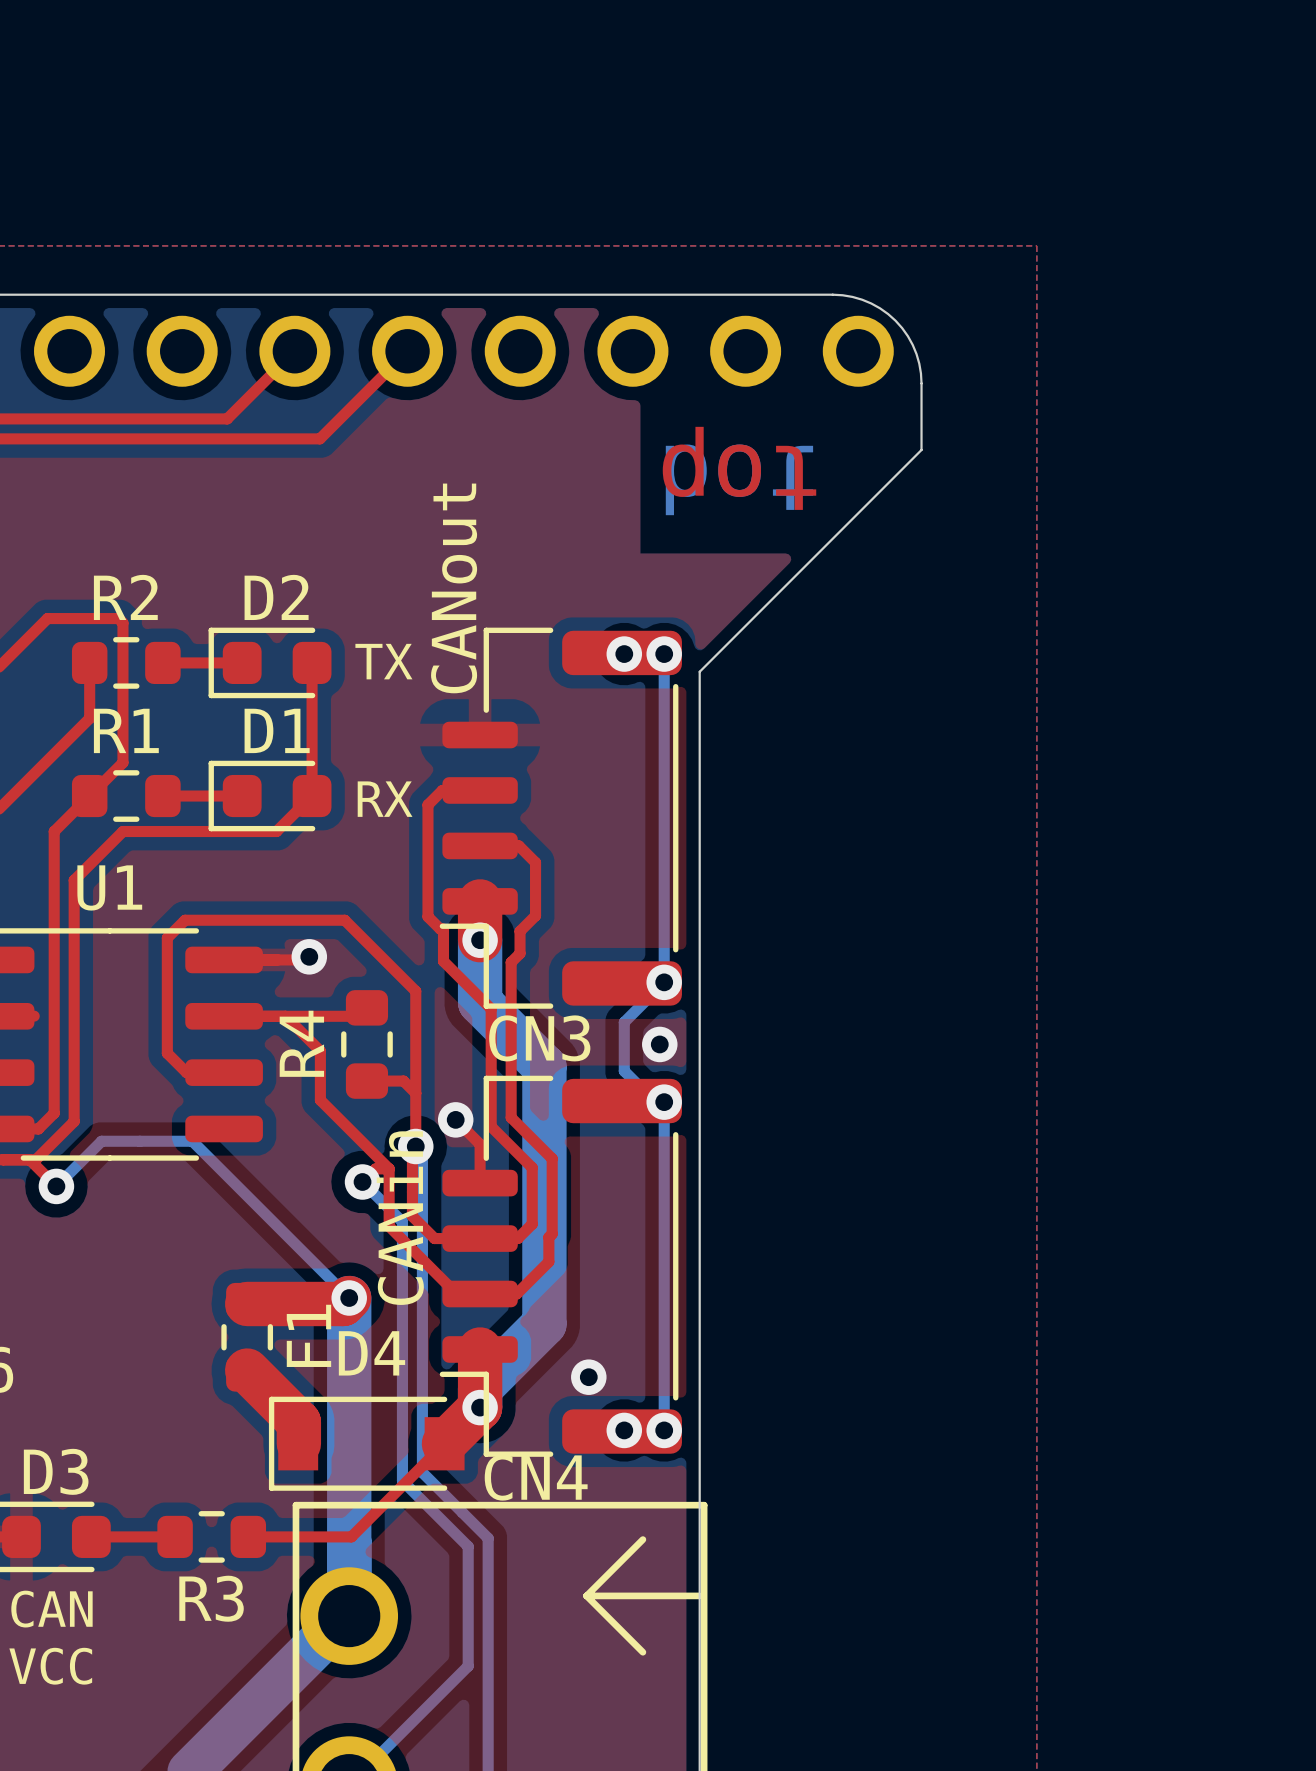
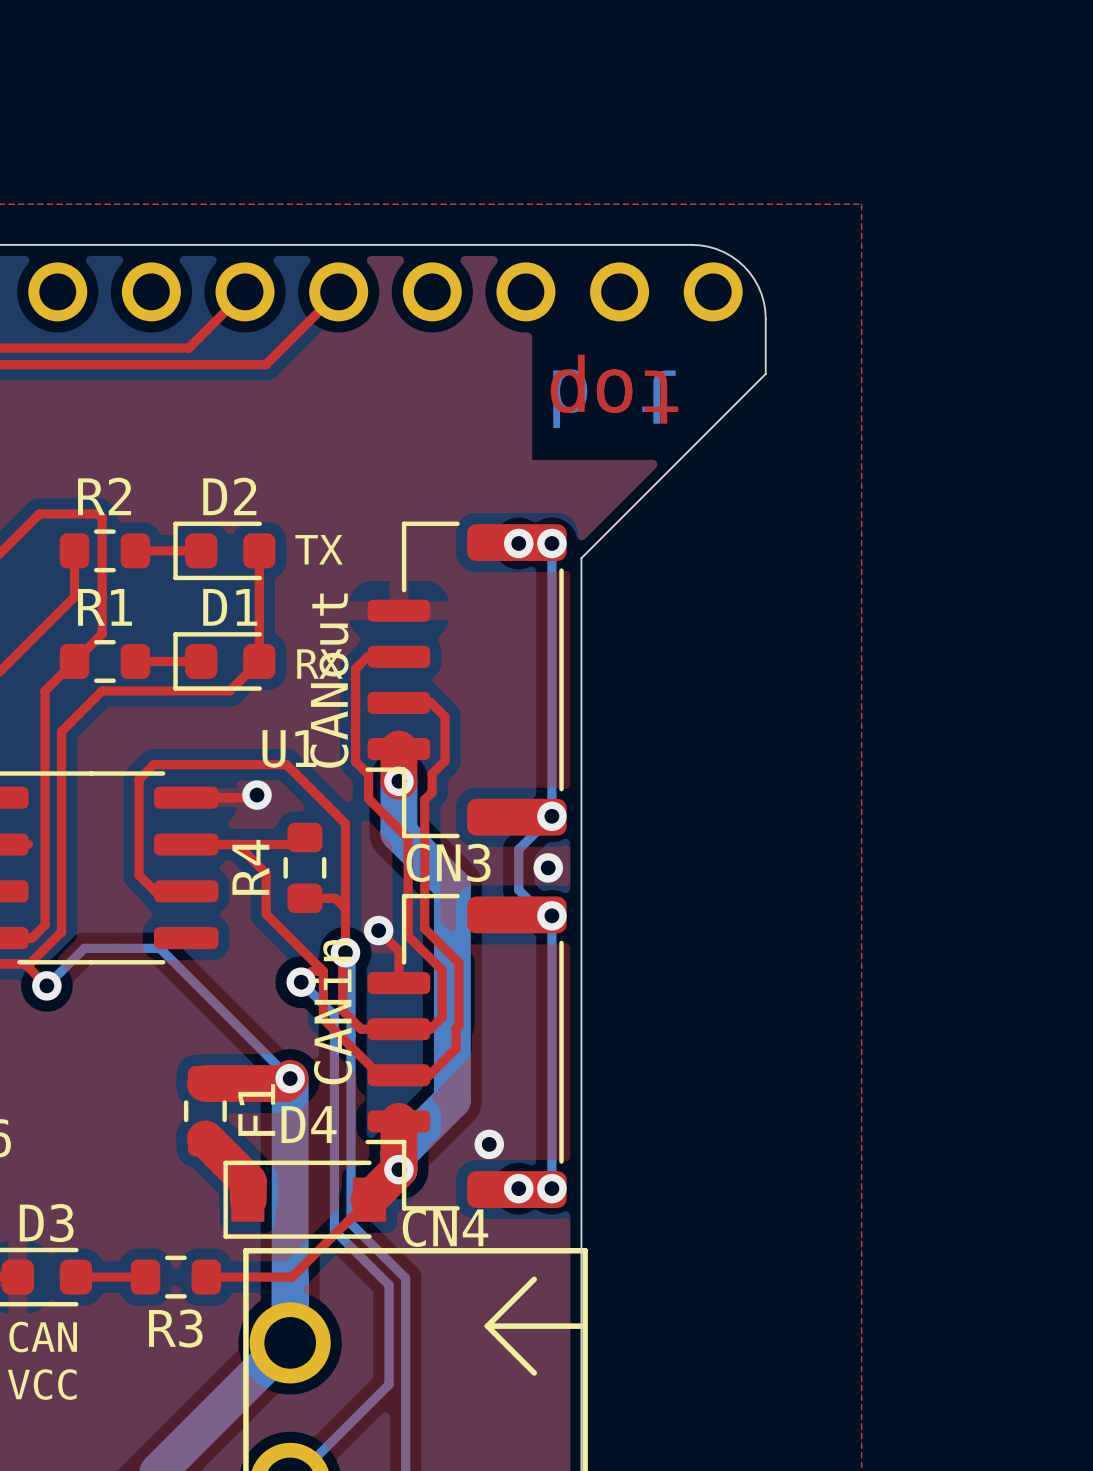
text position: CANout (454, 588) -> CANout (329, 680)
U1 name position: U1 (109, 887) -> U1 (289, 748)

